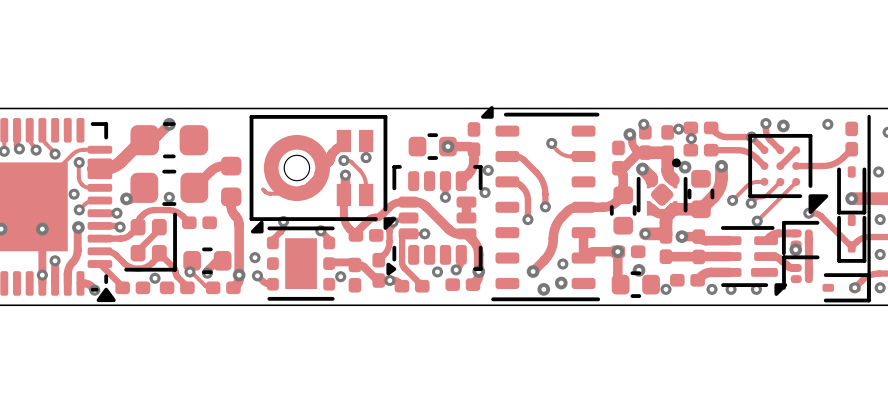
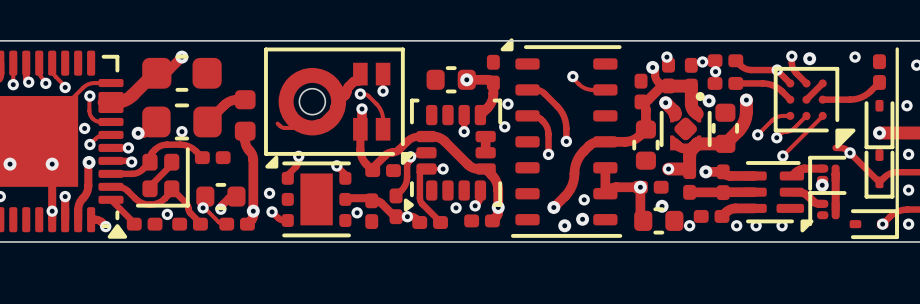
via position: (808, 213) -> (850, 152)

